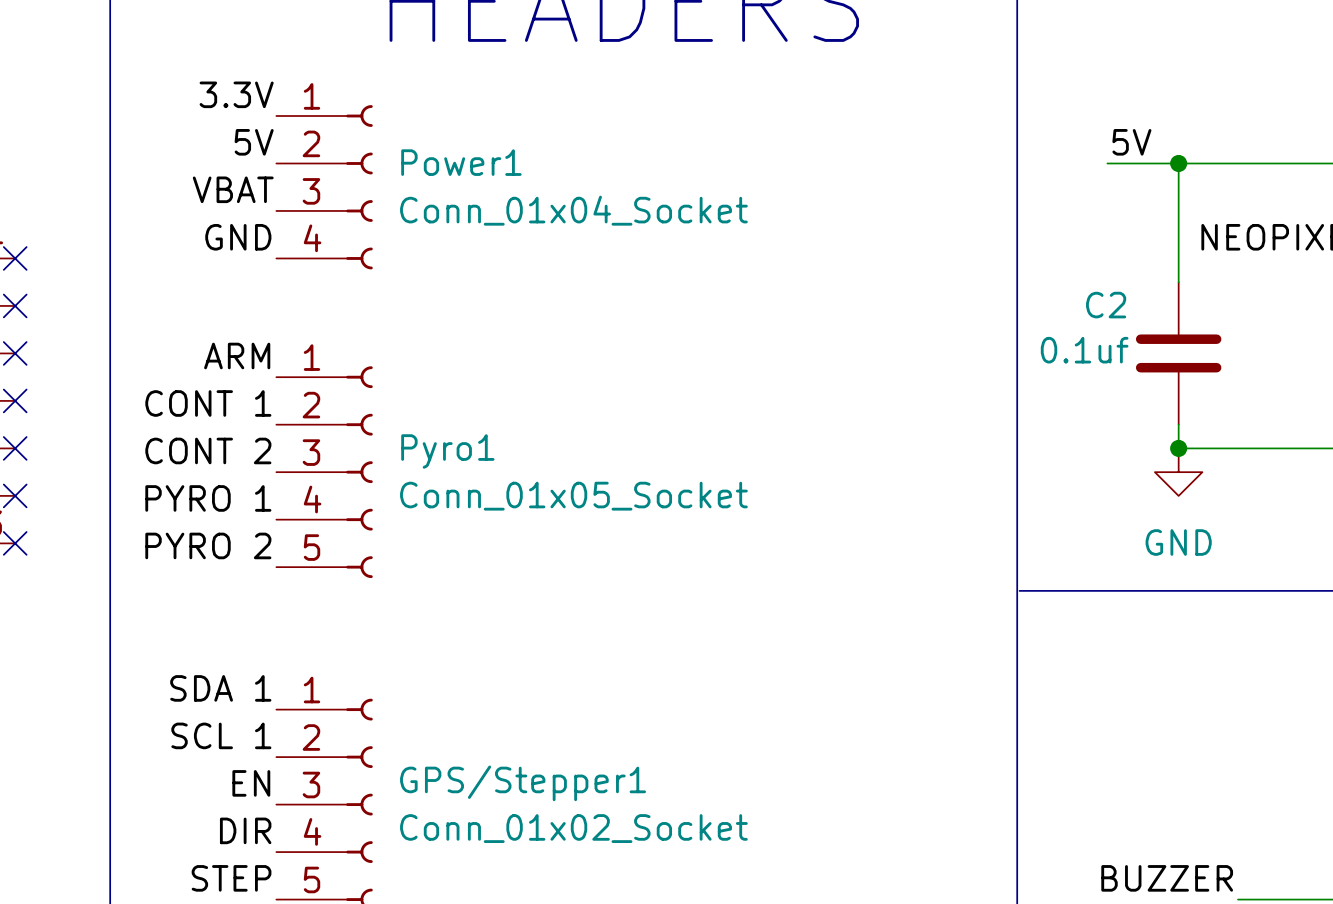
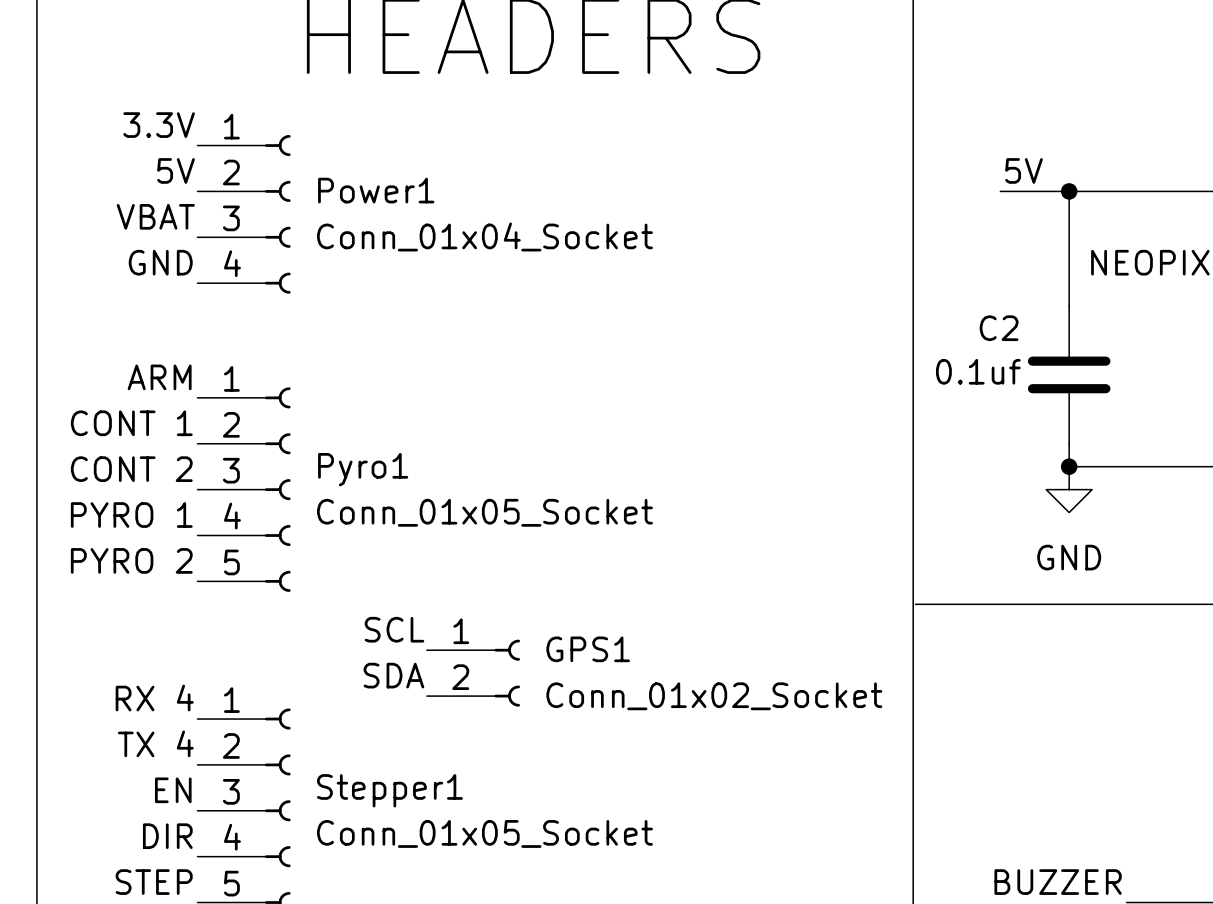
label: none -> SCL (394, 629)
GPS1: none -> Conn_01x02_Socket (473, 673)
label: none -> SDA (393, 675)
label: SDA 1 (220, 688) -> RX 4 (154, 698)
label: SCL 1 (221, 735) -> TX 4 (155, 743)
GPS/Stepper1 name: GPS/Stepper1 (523, 783) -> Stepper1 (389, 790)
GPS/Stepper1 value: Conn_01x02_Socket (573, 828) -> Conn_01x05_Socket (484, 833)

